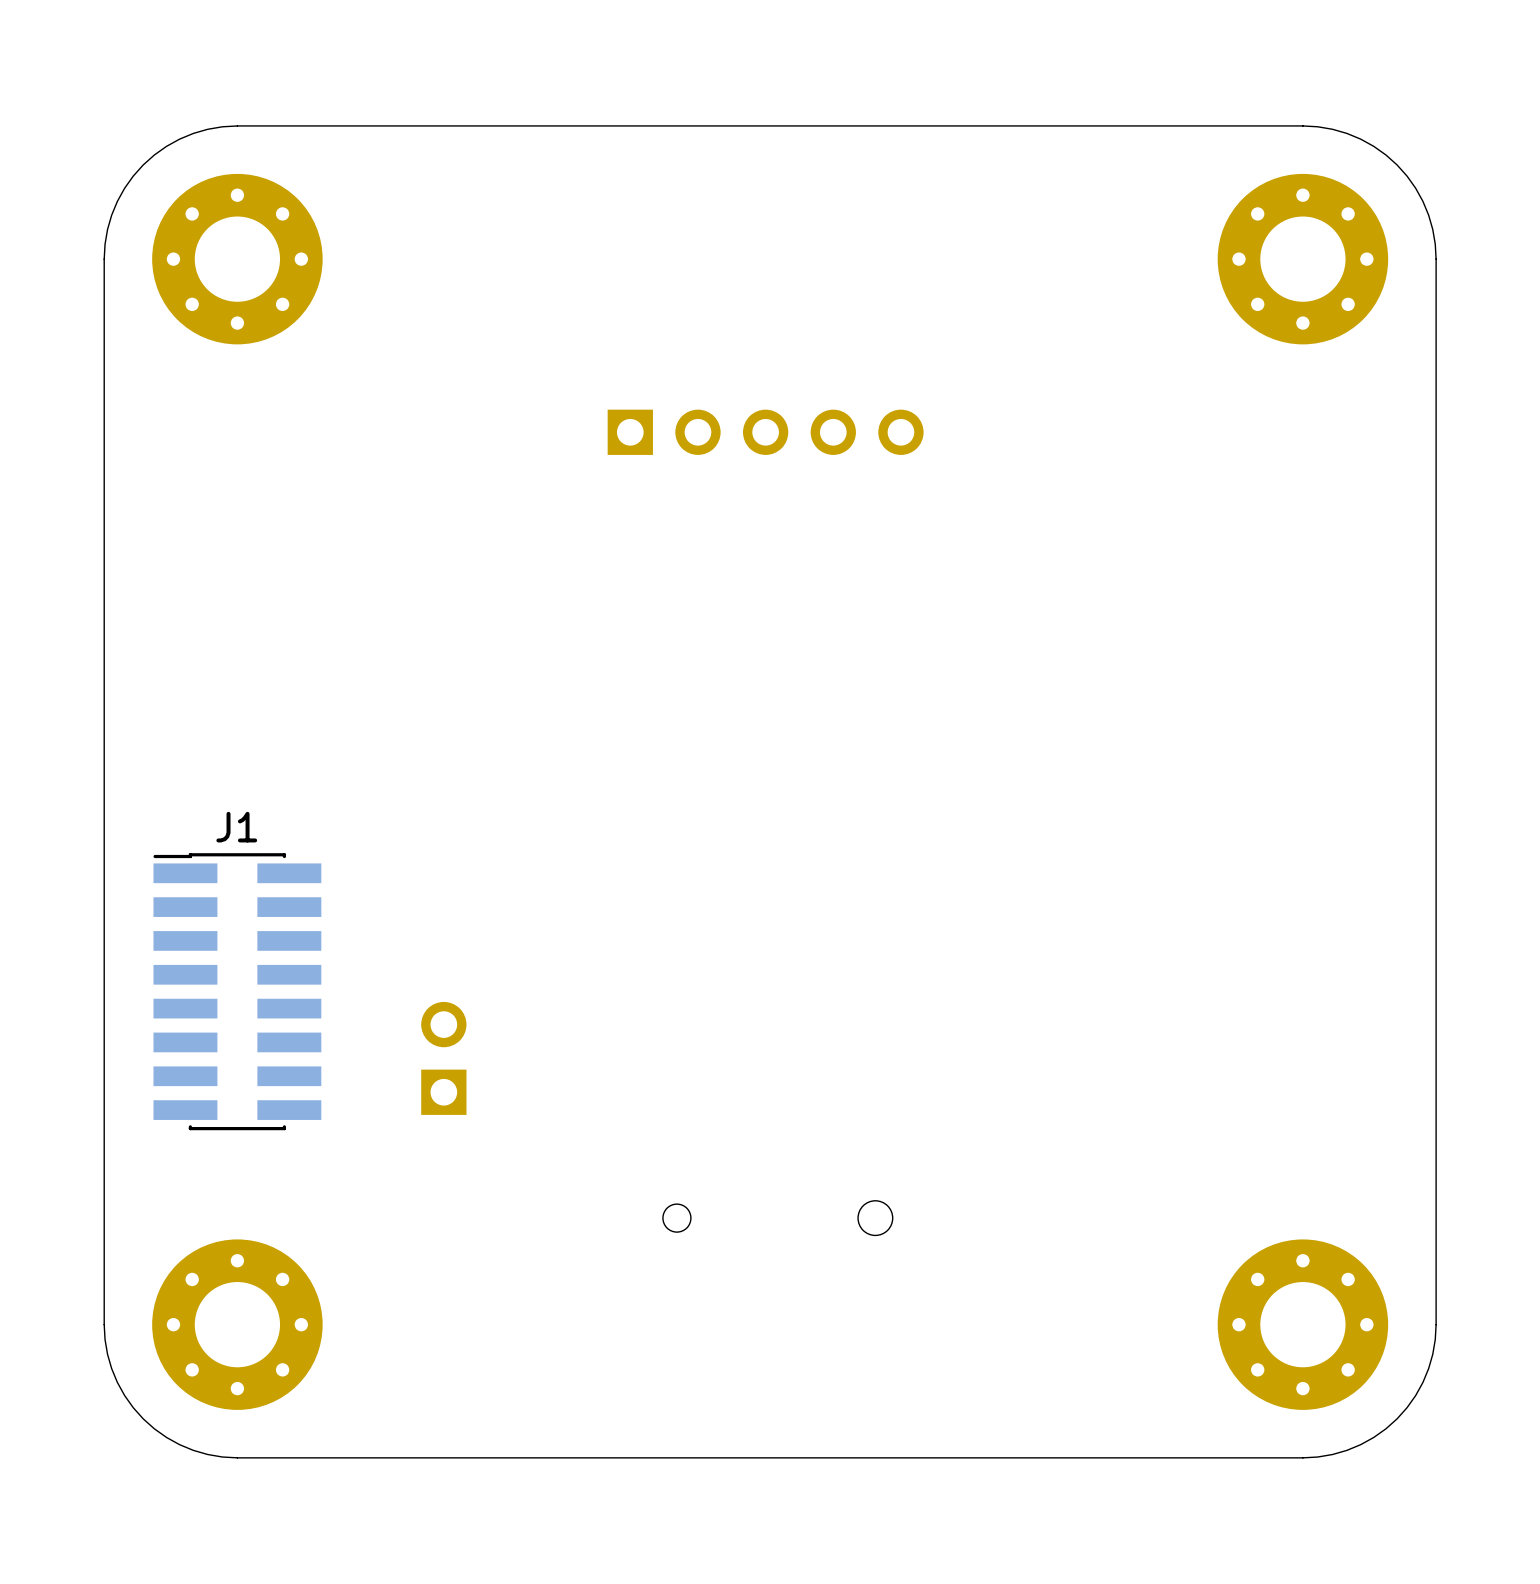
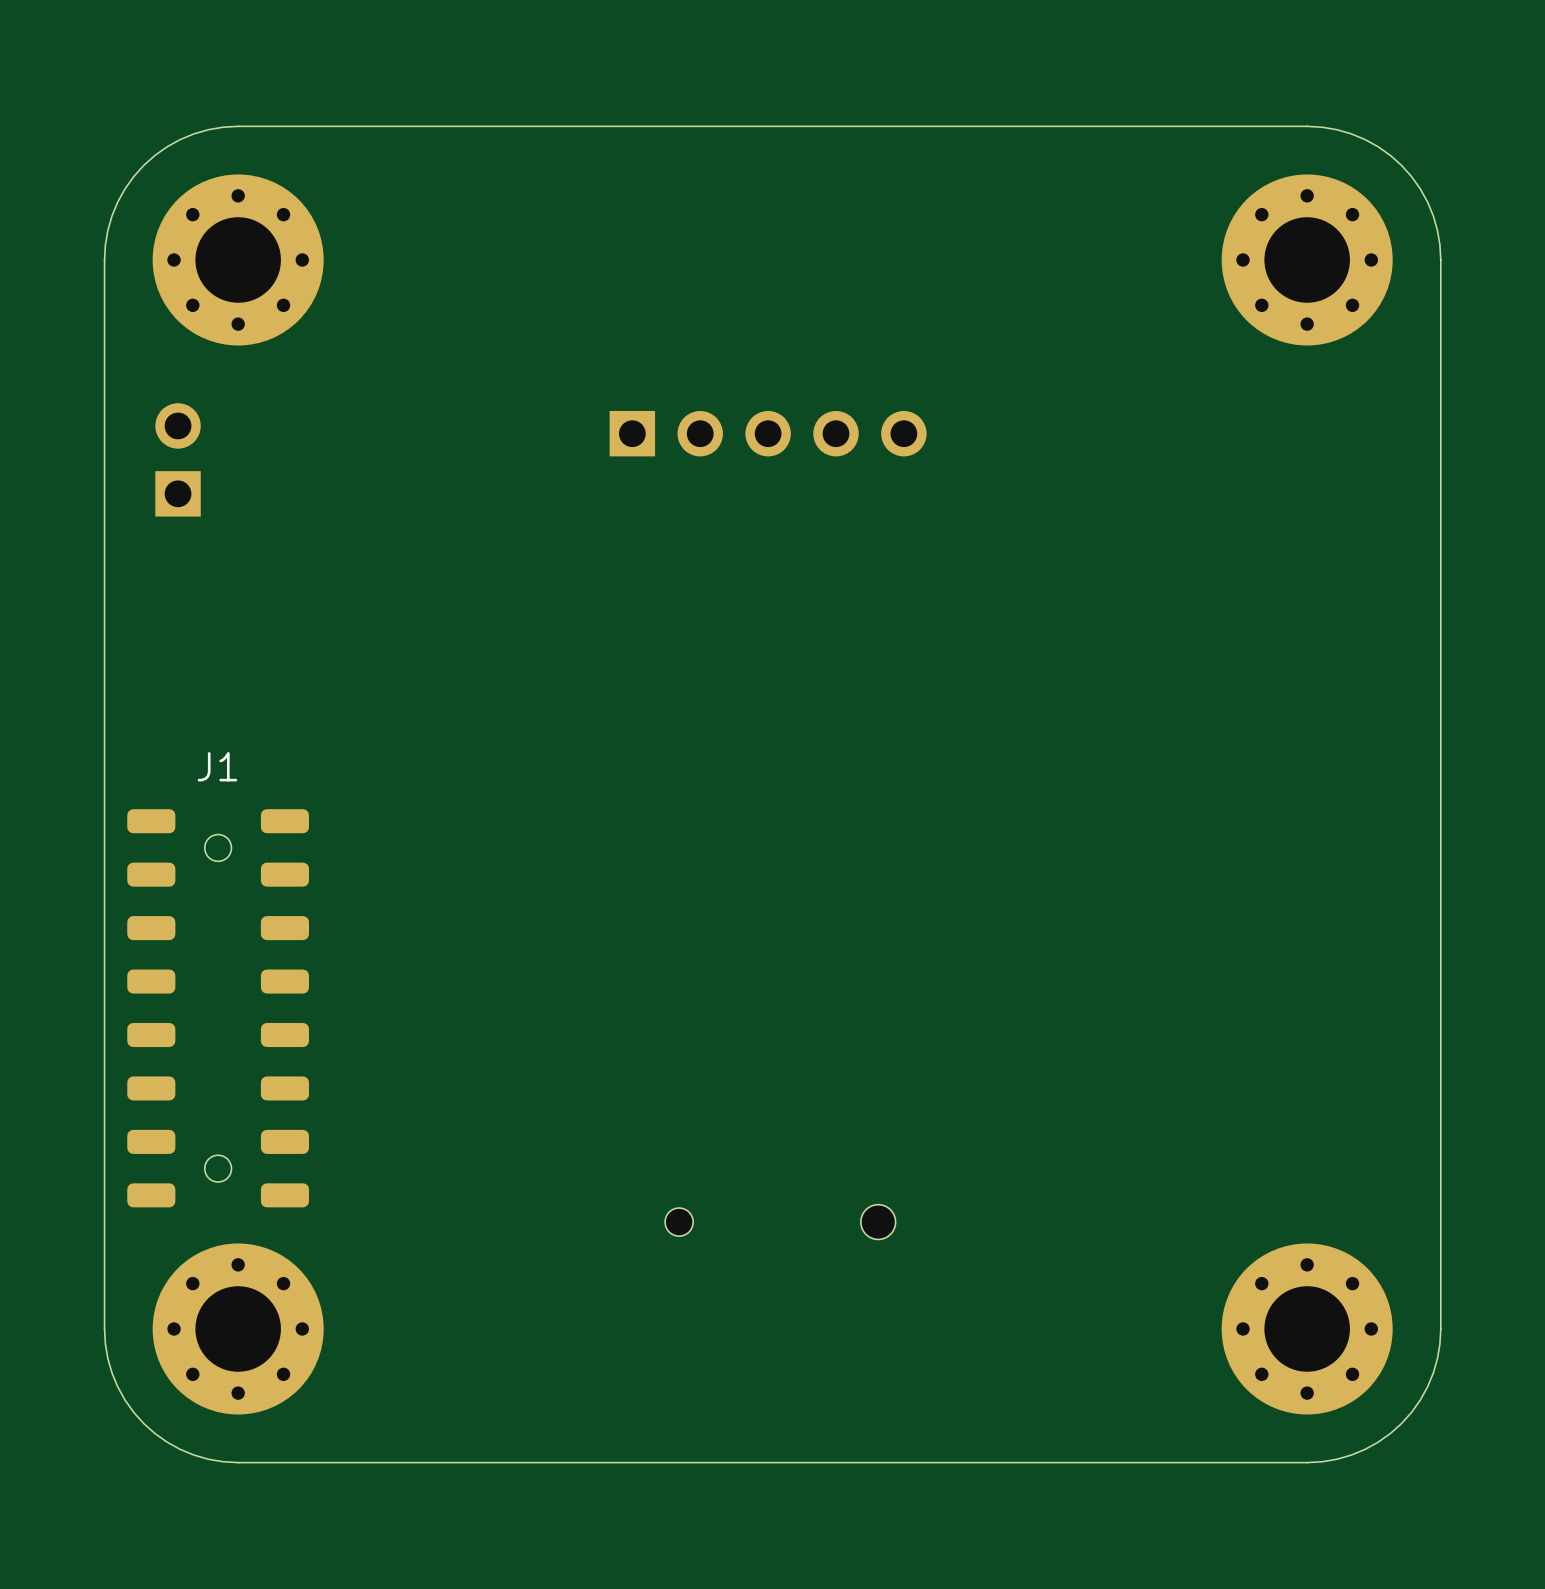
J1 name position: J1 (236, 827) -> J1 (217, 766)
J1 footprint: [153, 853, 322, 1131] -> [127, 809, 309, 1208]
part position: (443, 1058) -> (178, 459)

